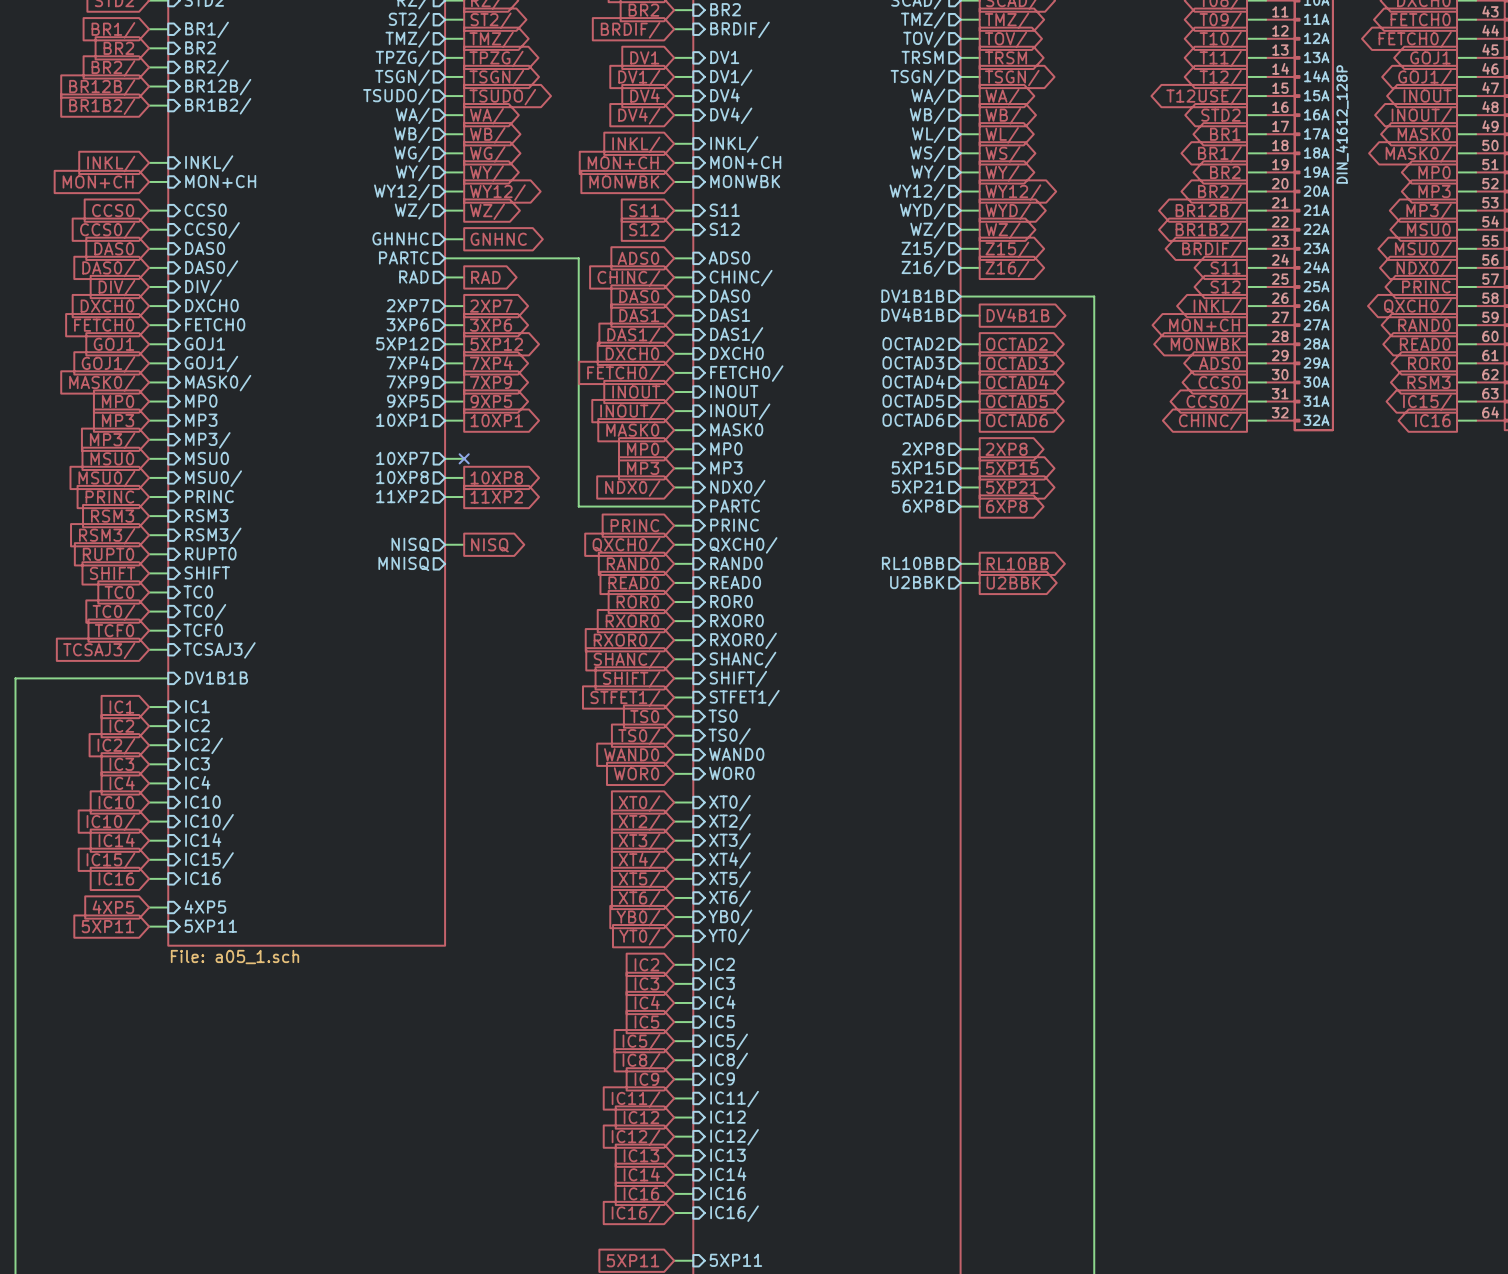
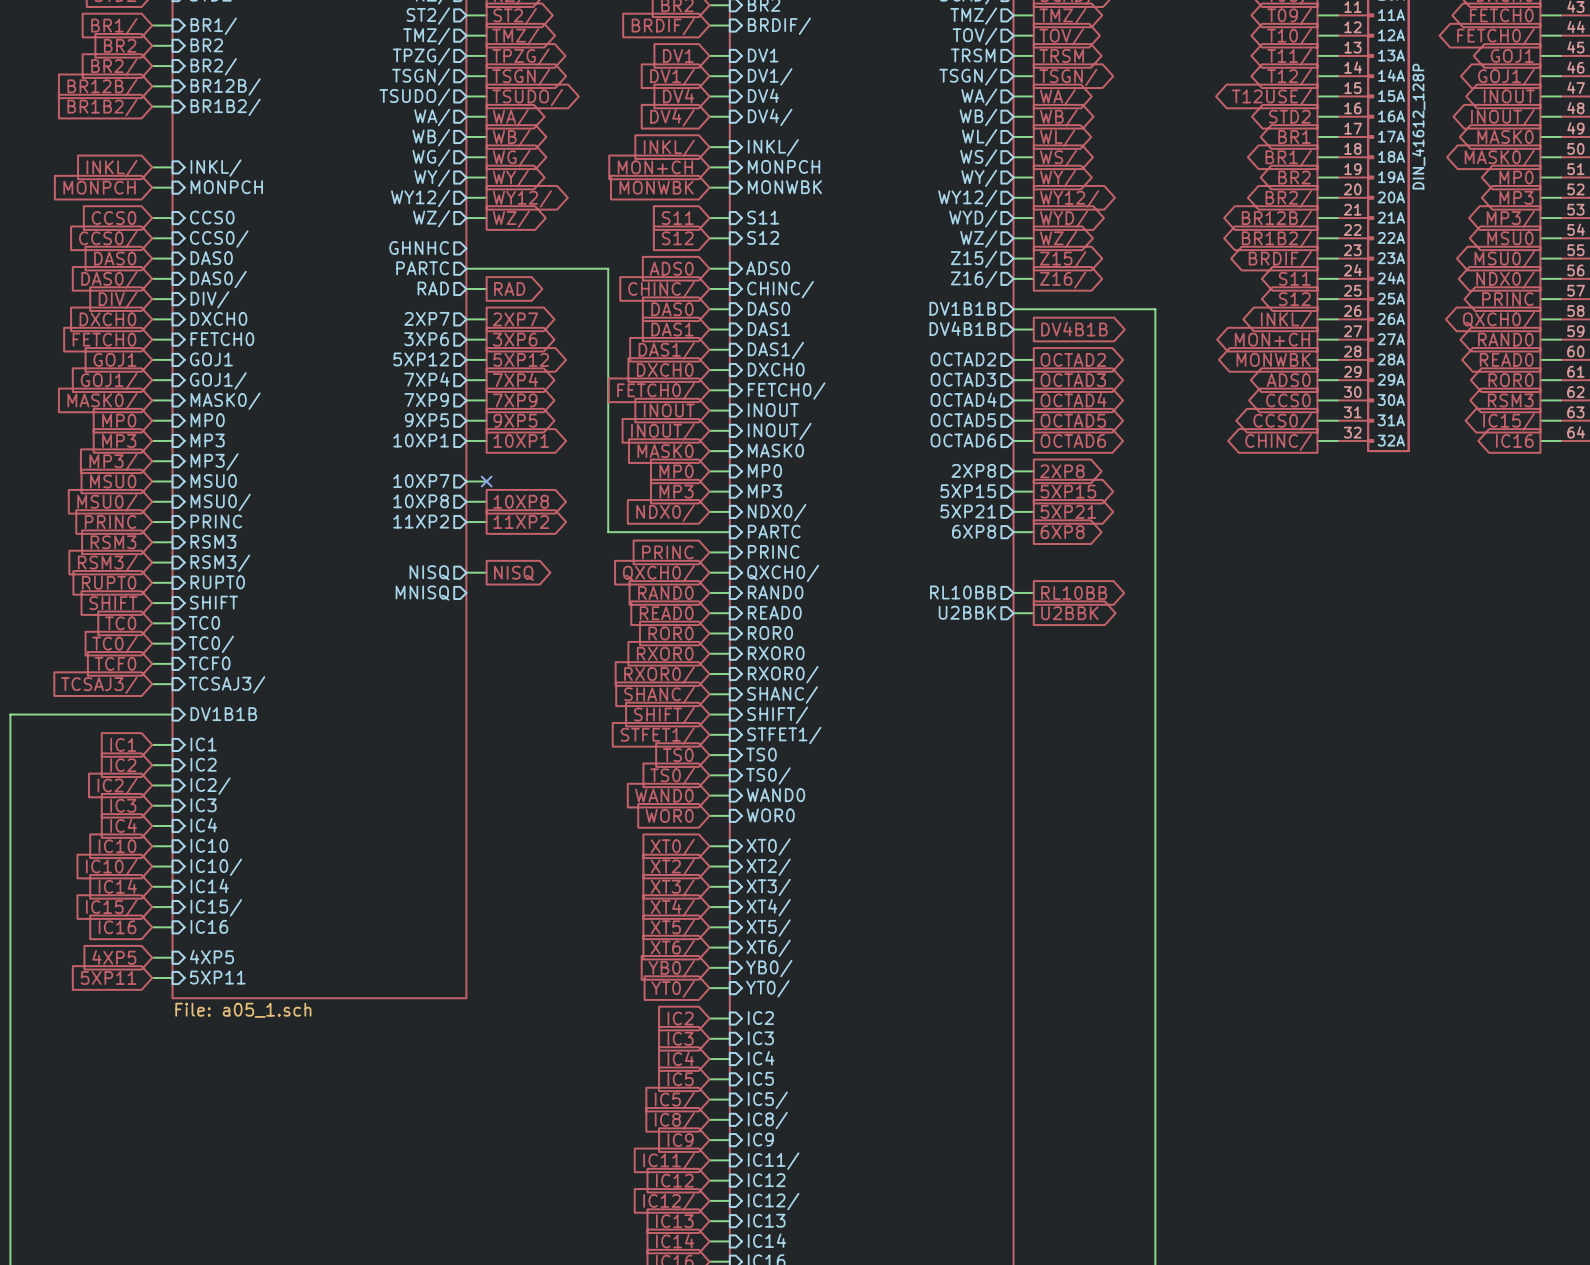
sheet pin: MON+CH (745, 162) -> MONPCH (784, 166)
global label: MON+CH (98, 181) -> MONPCH (99, 187)
sheet pin: MON+CH (220, 181) -> MONPCH (226, 187)
wire: (445, 239) (464, 239) -> none
global label: GNHNC (498, 239) -> none

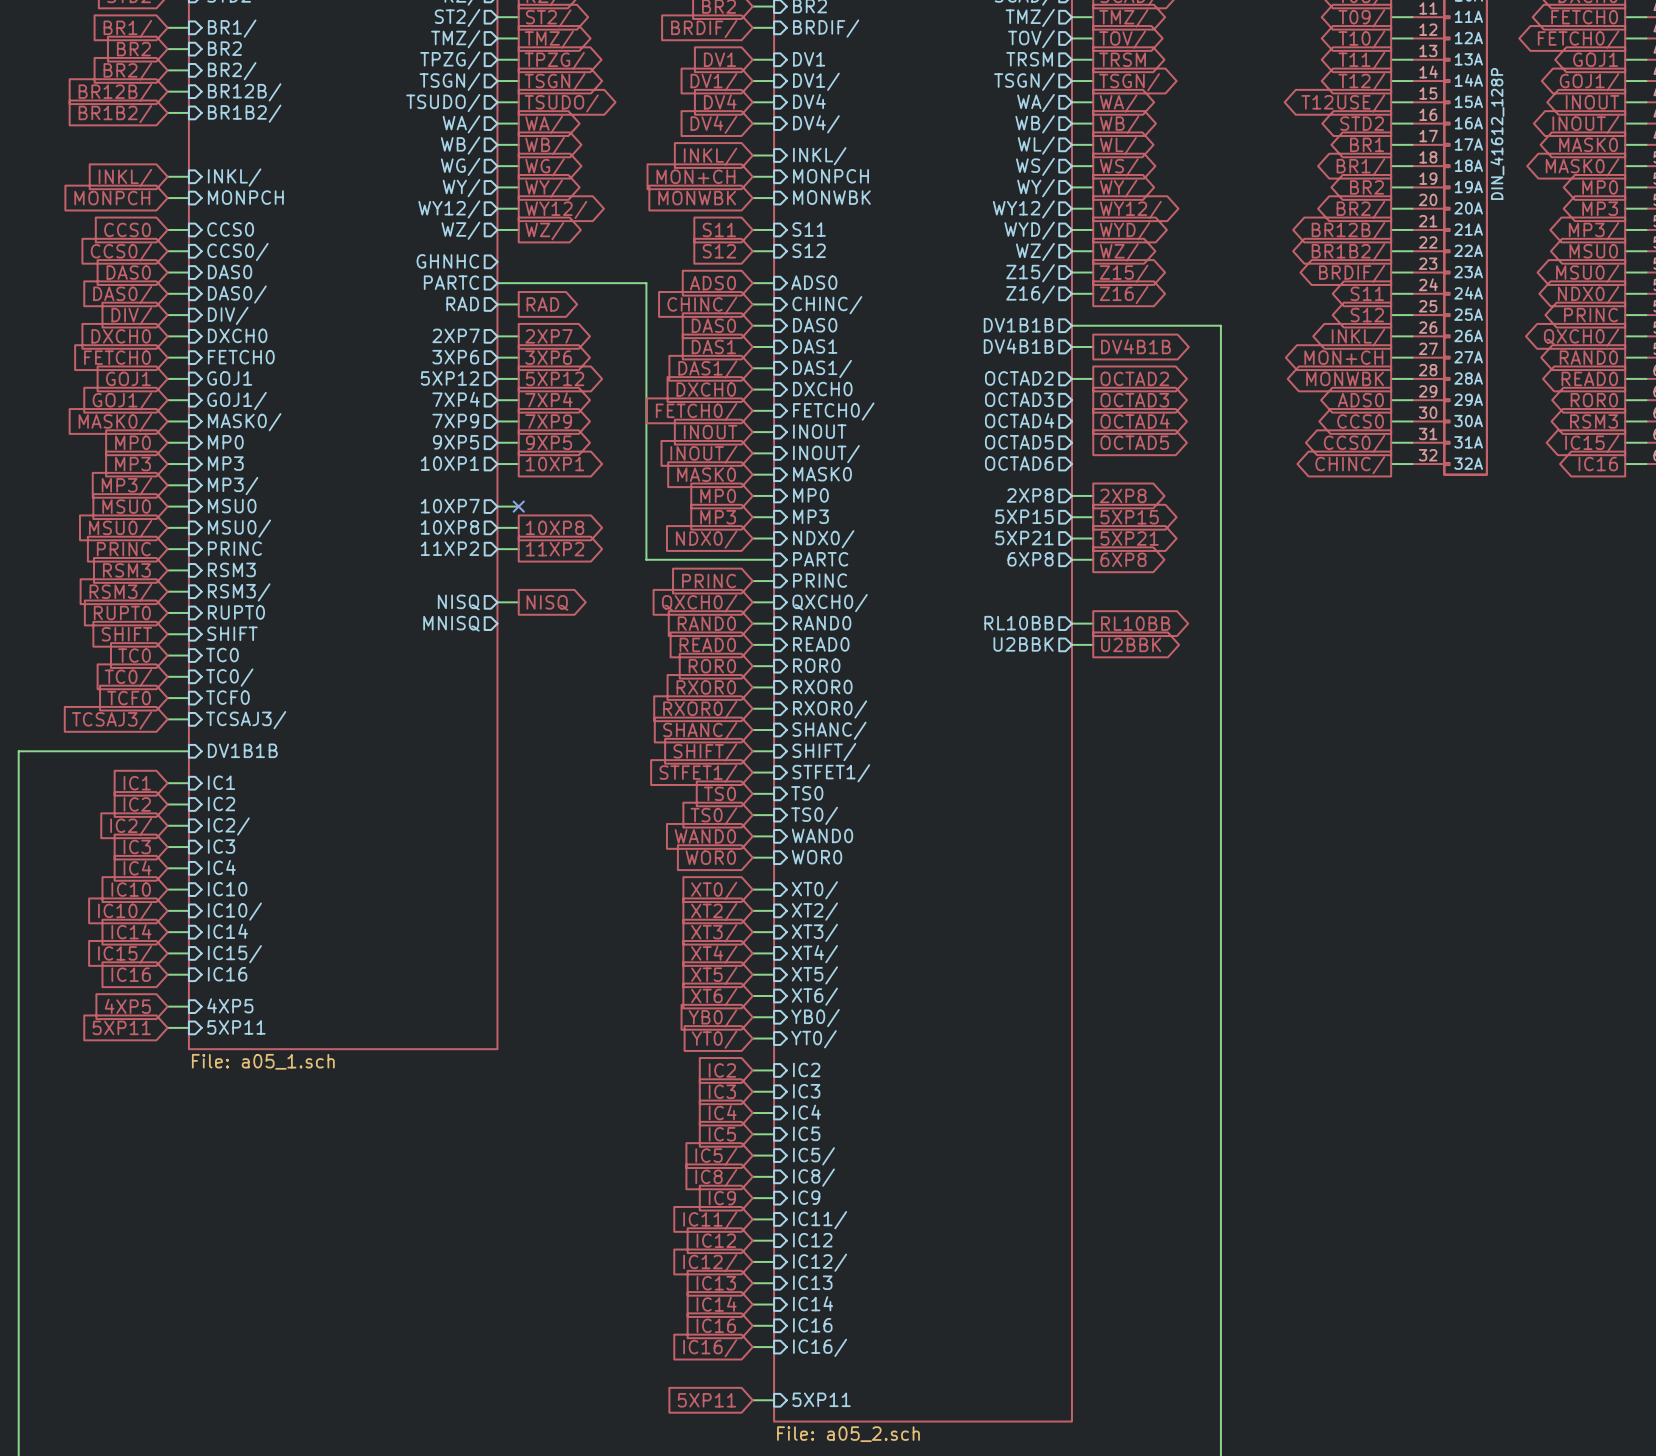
wire: (1013, 380) (1033, 380) -> none
wire: (1013, 400) (1033, 400) -> none
wire: (1013, 420) (1033, 420) -> none
wire: (1013, 440) (1033, 440) -> none
global label: OCTAD6 (1073, 440) -> none

